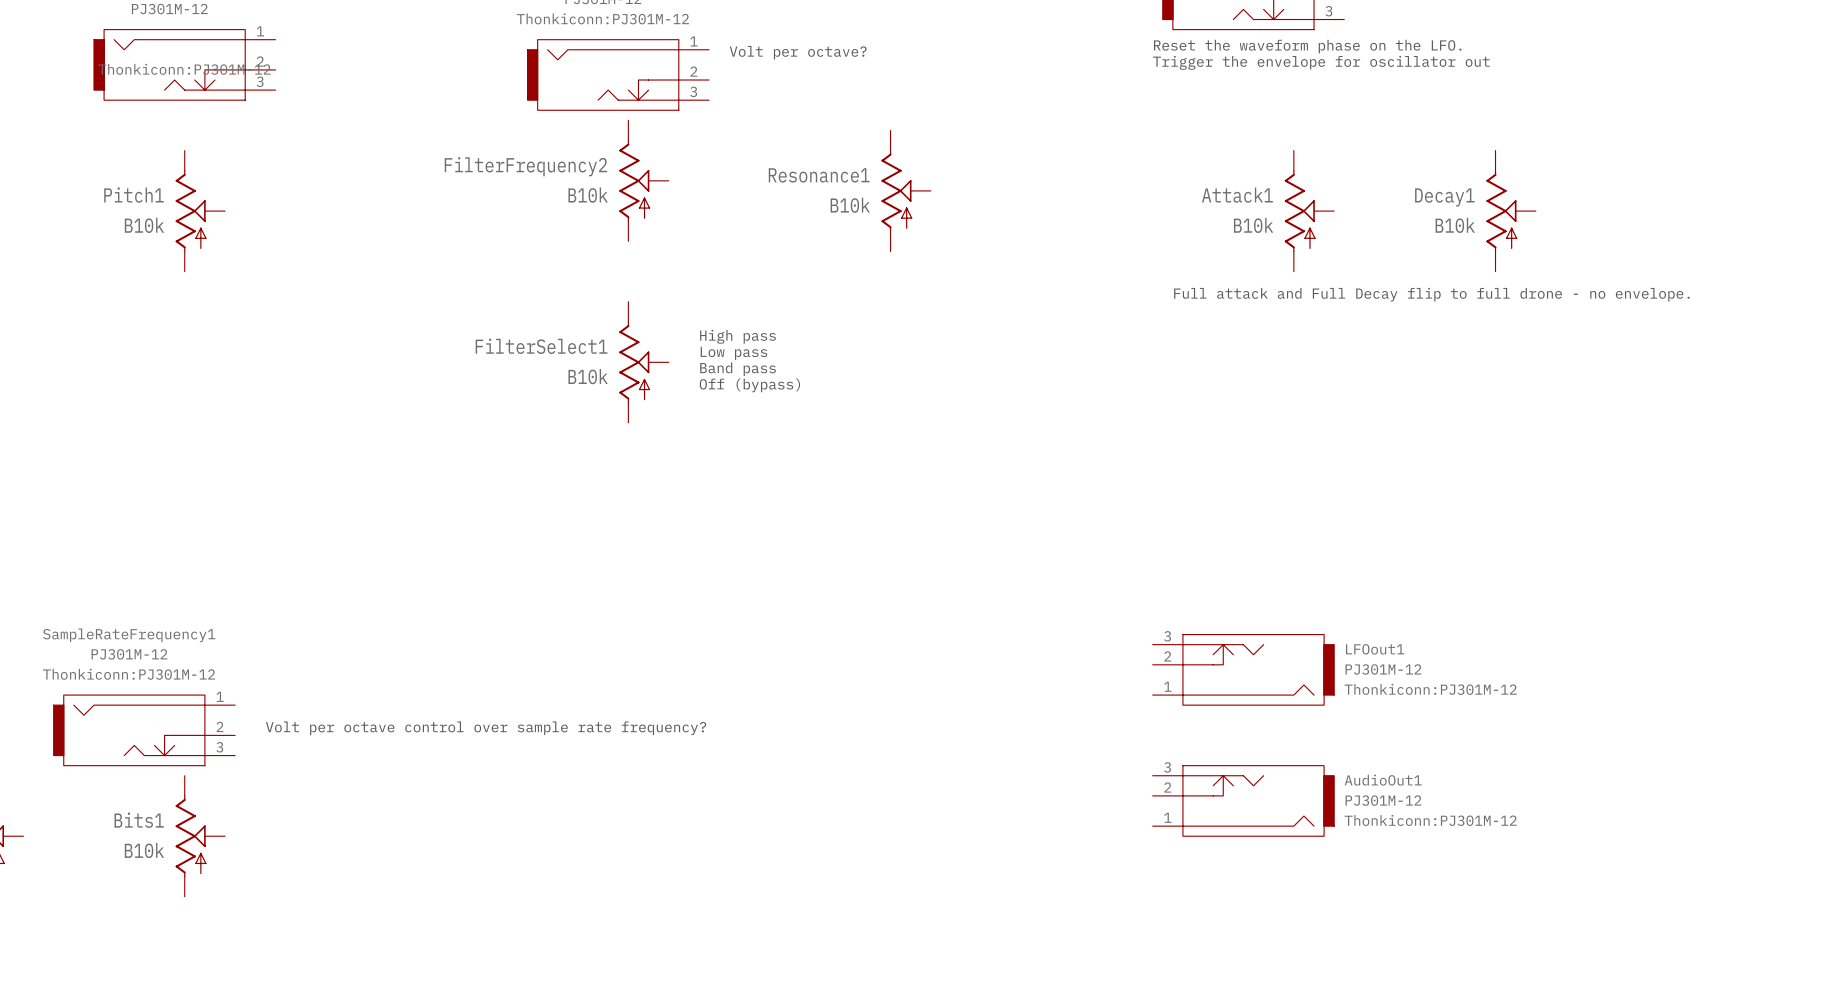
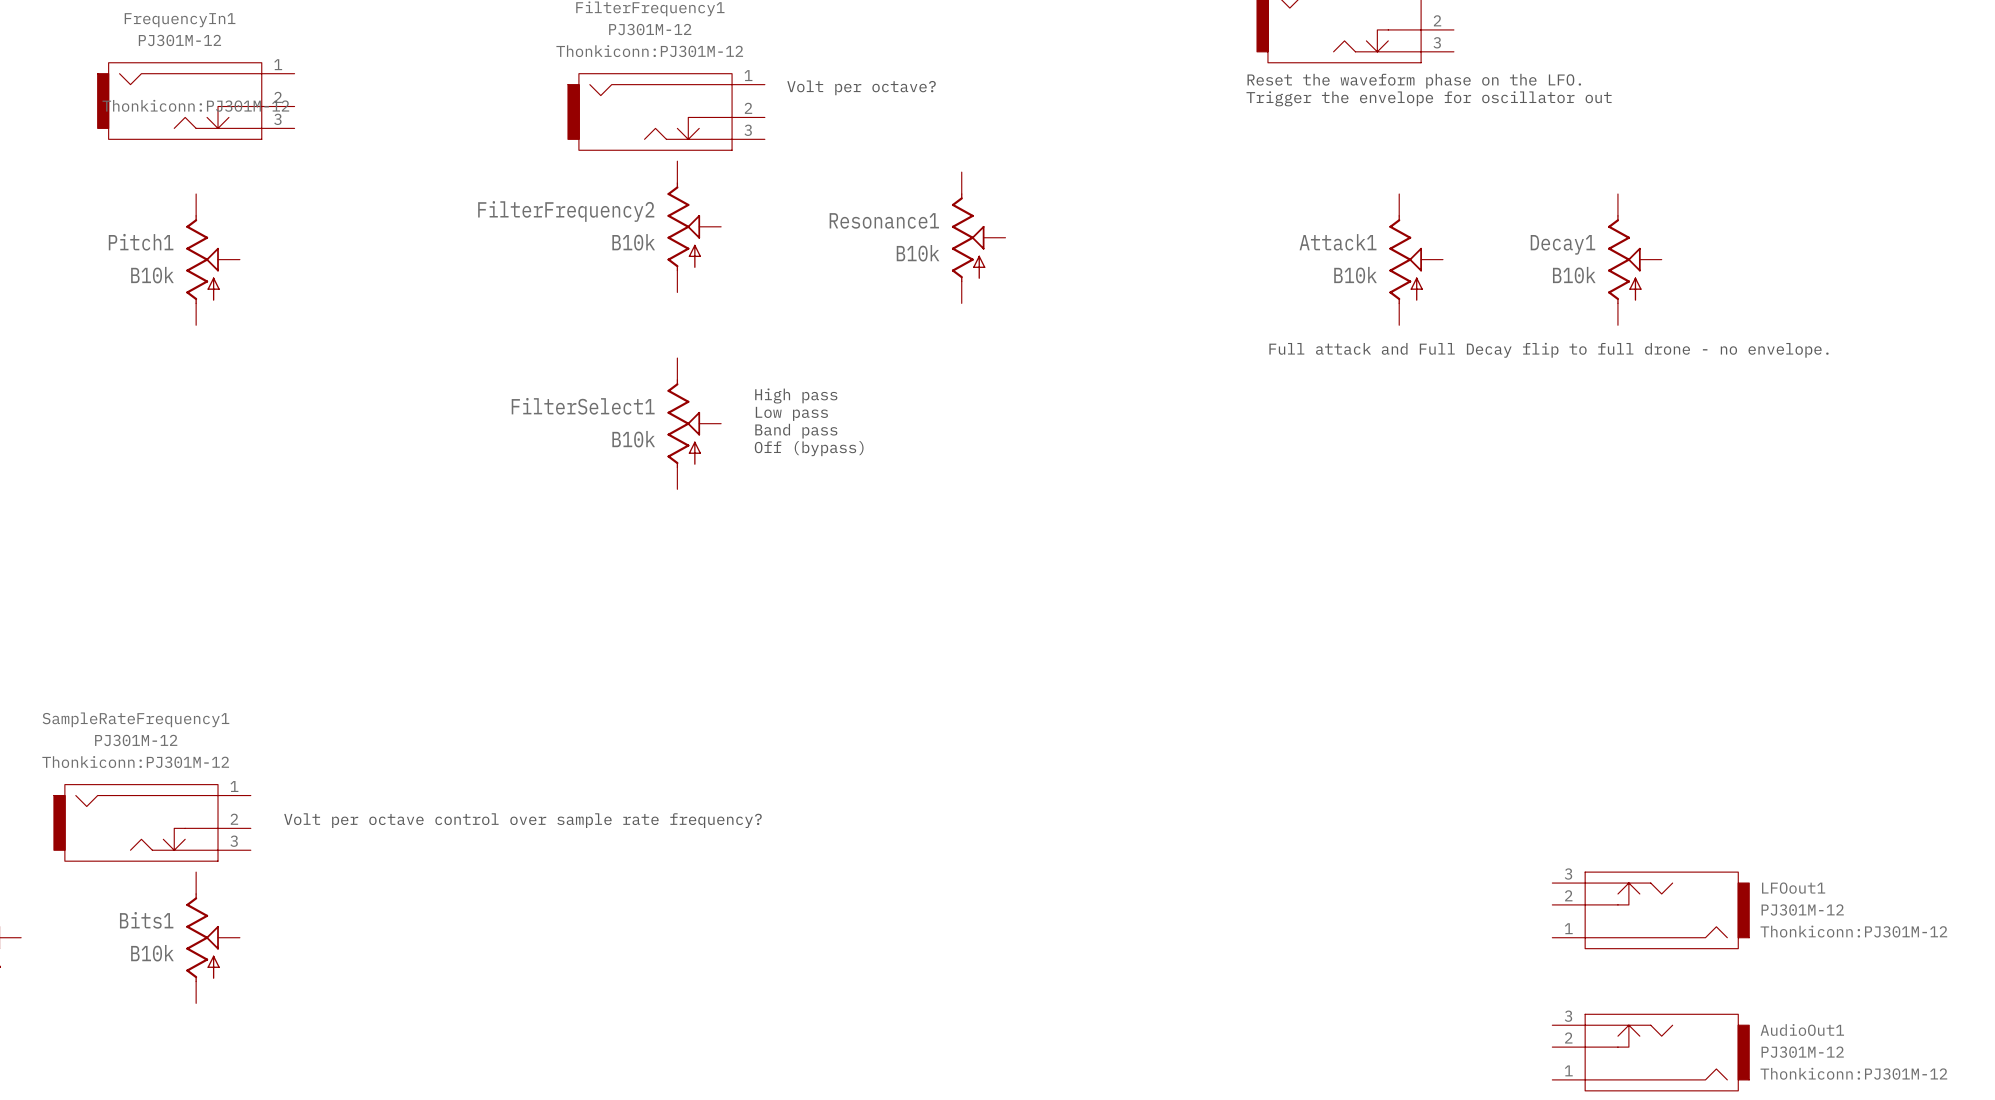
LFOout1 position: (1243, 669) -> (1650, 910)
AudioOut1 position: (1243, 800) -> (1650, 1052)

